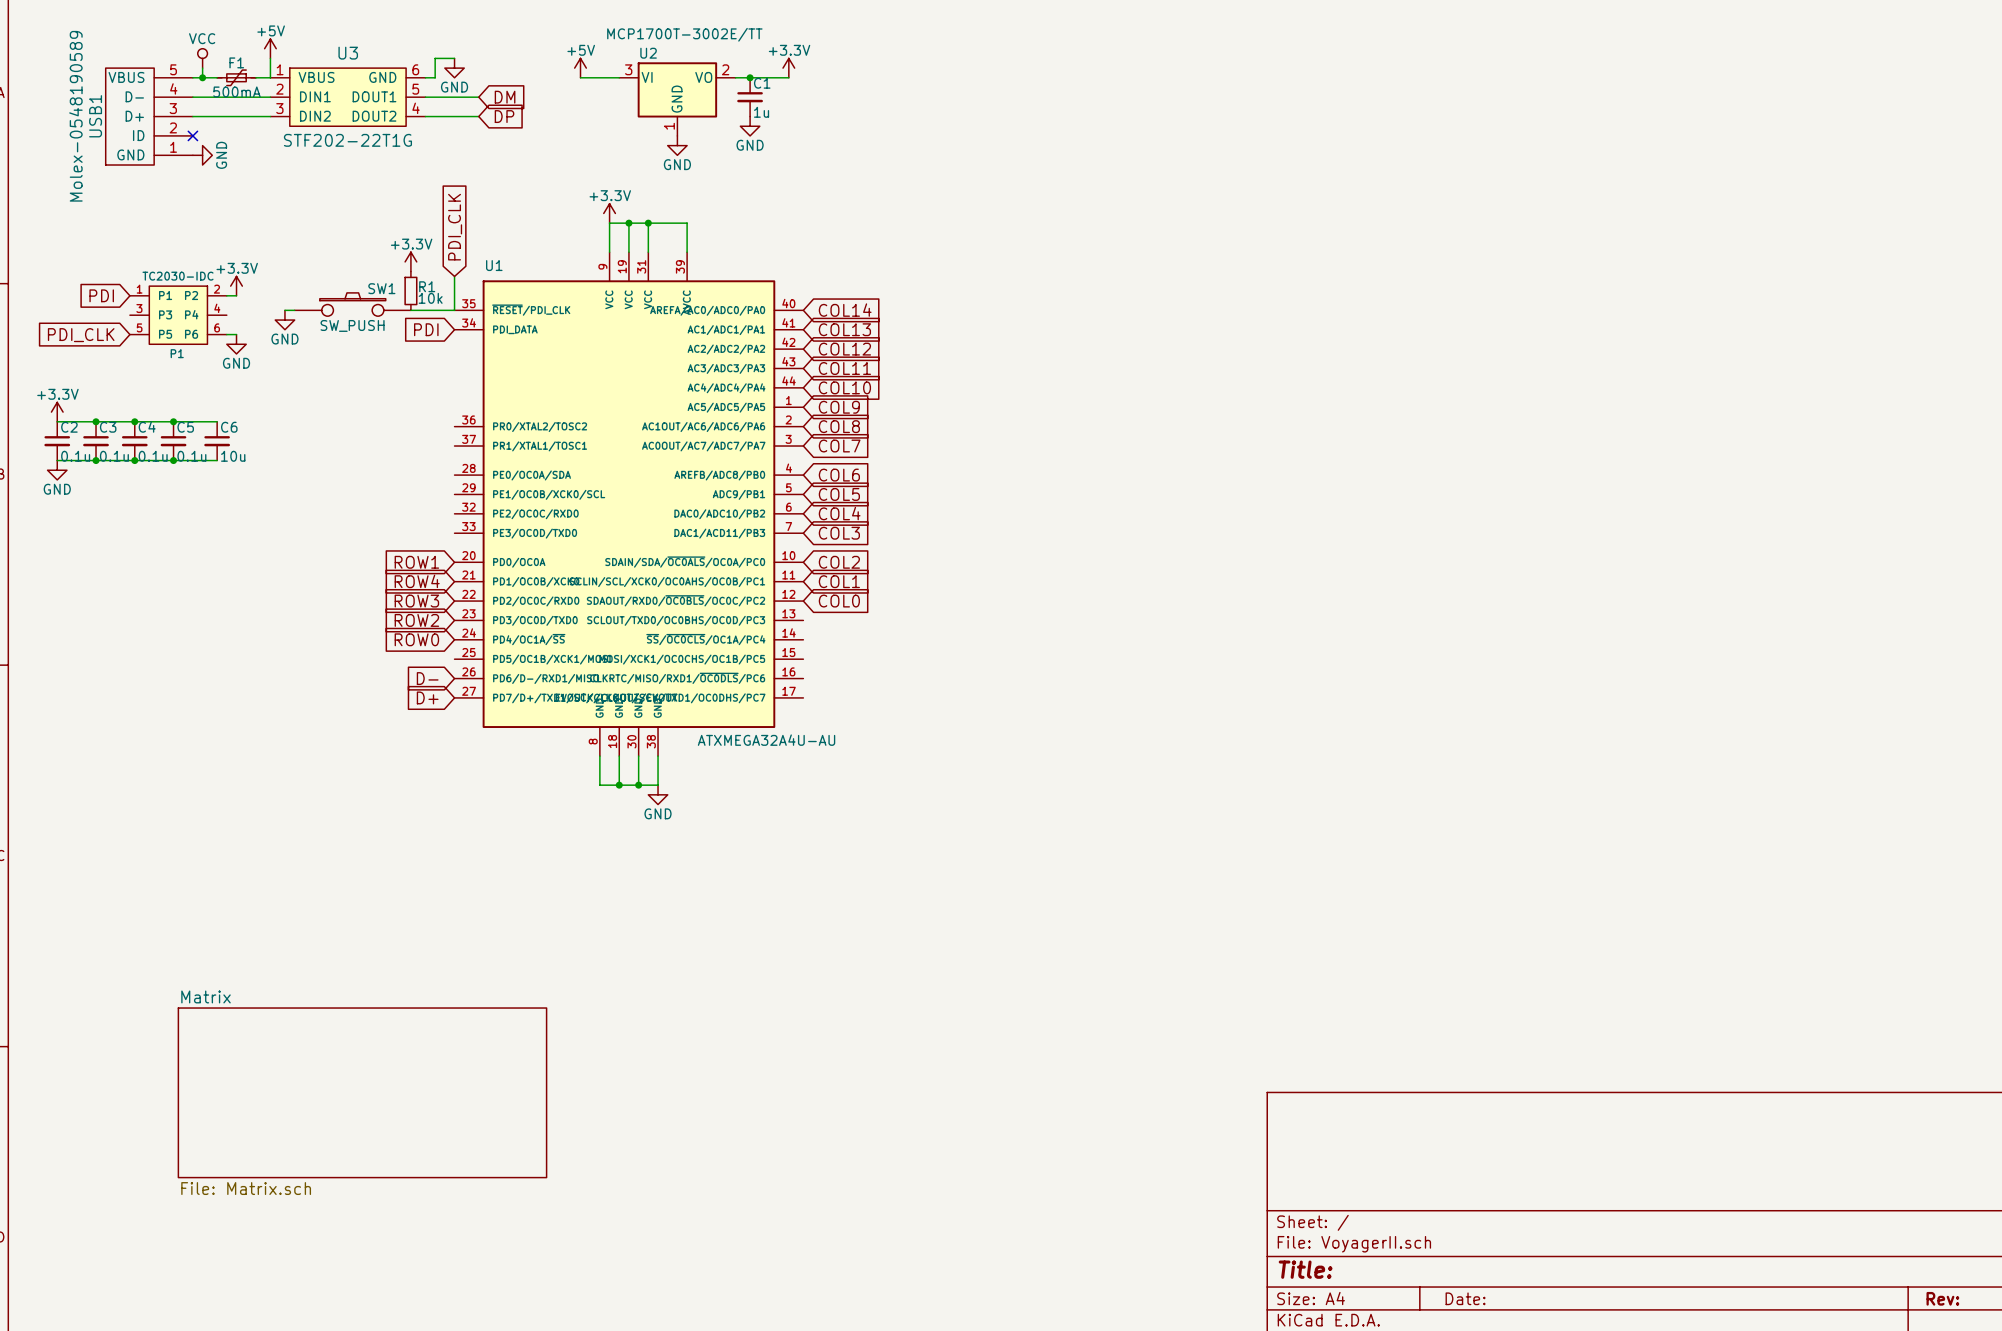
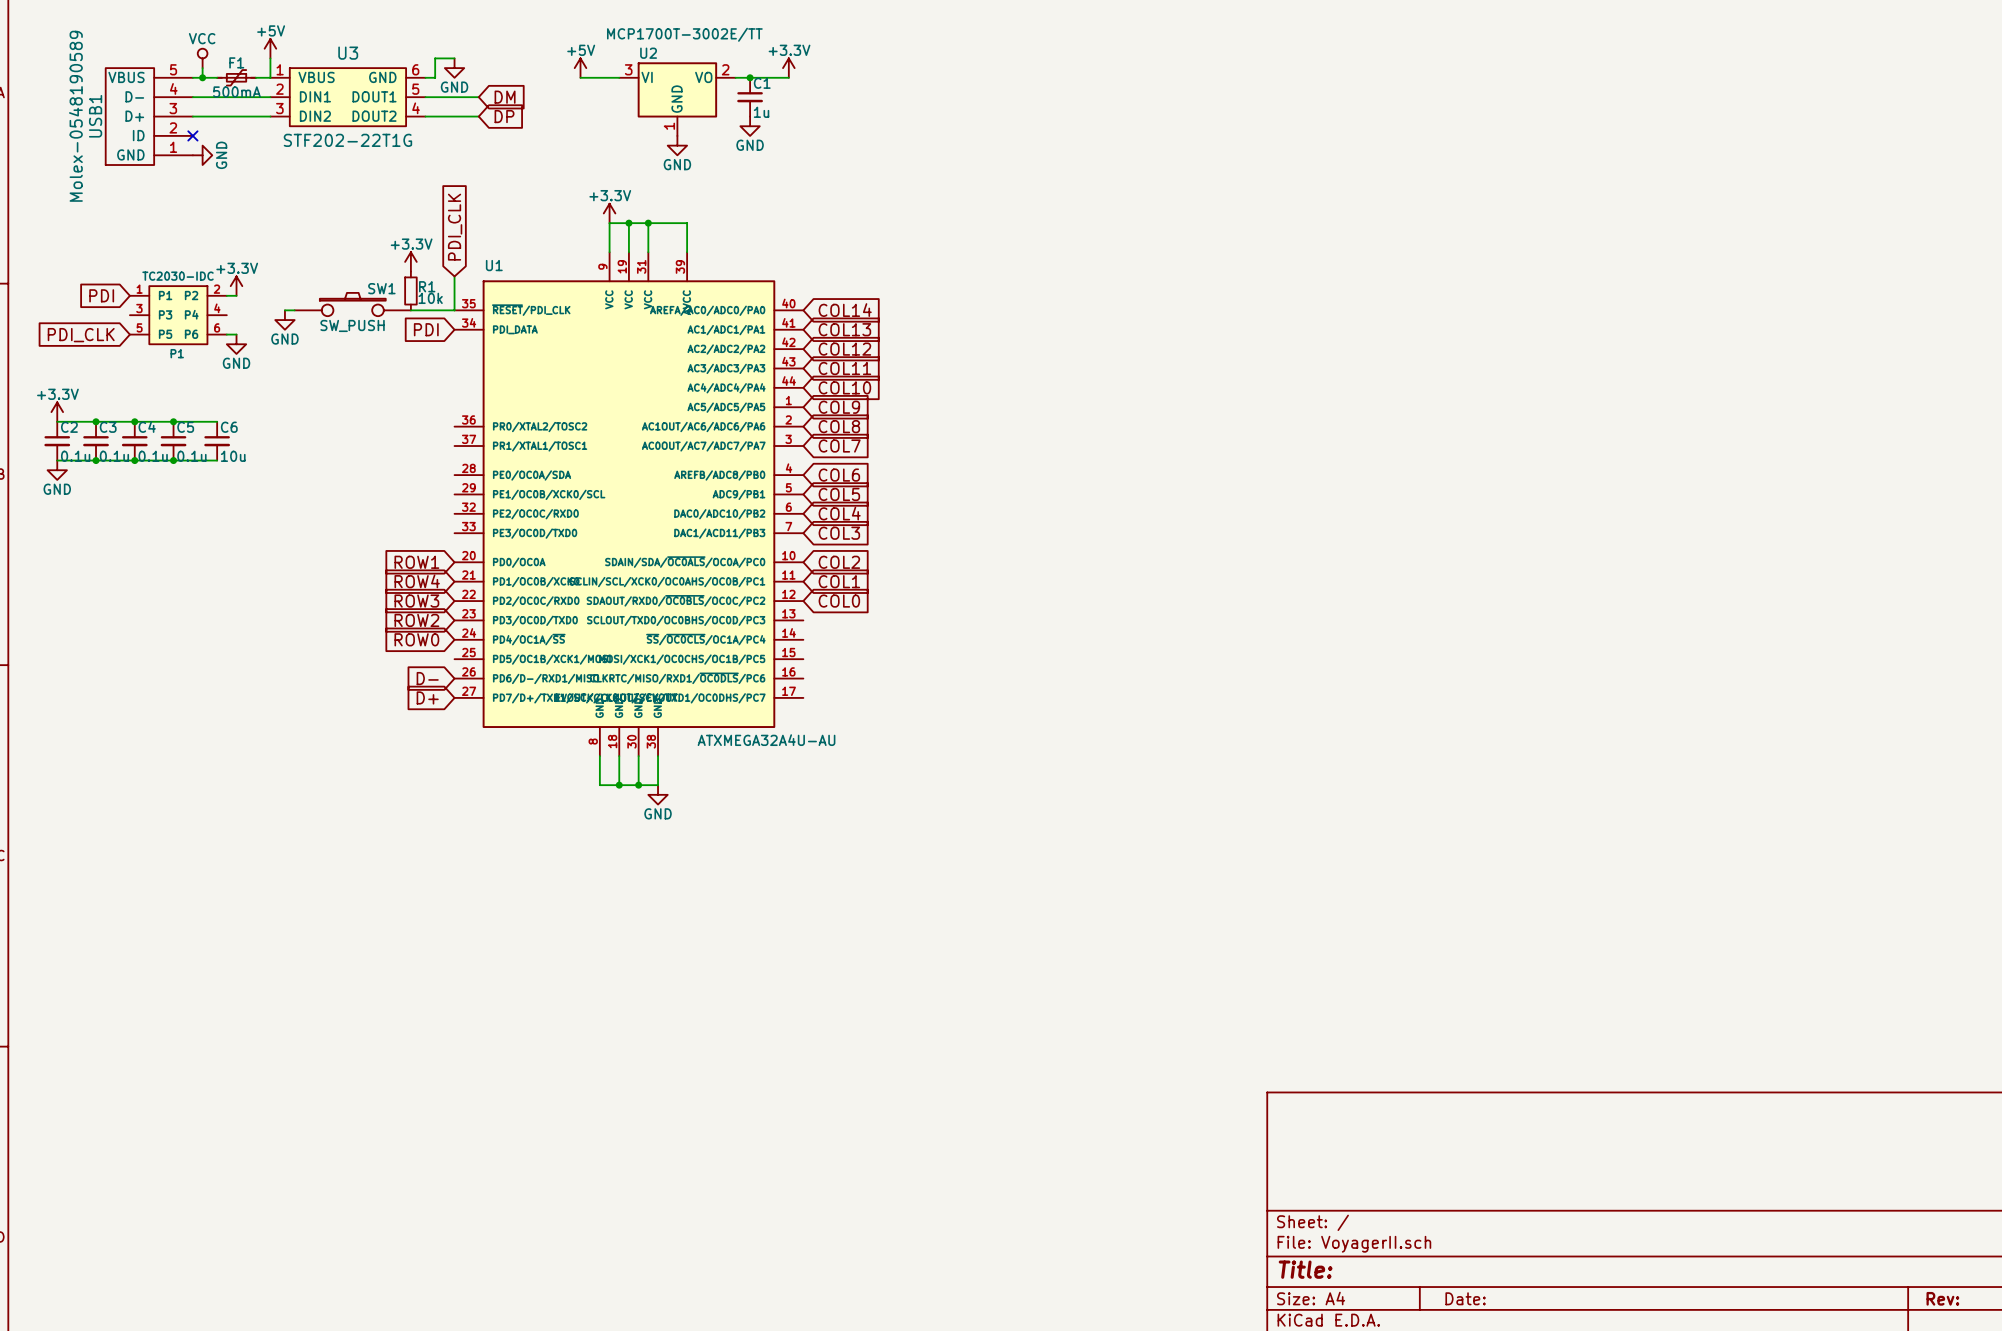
sheet Matrix: File: Matrix.sch (362, 1092) -> none

